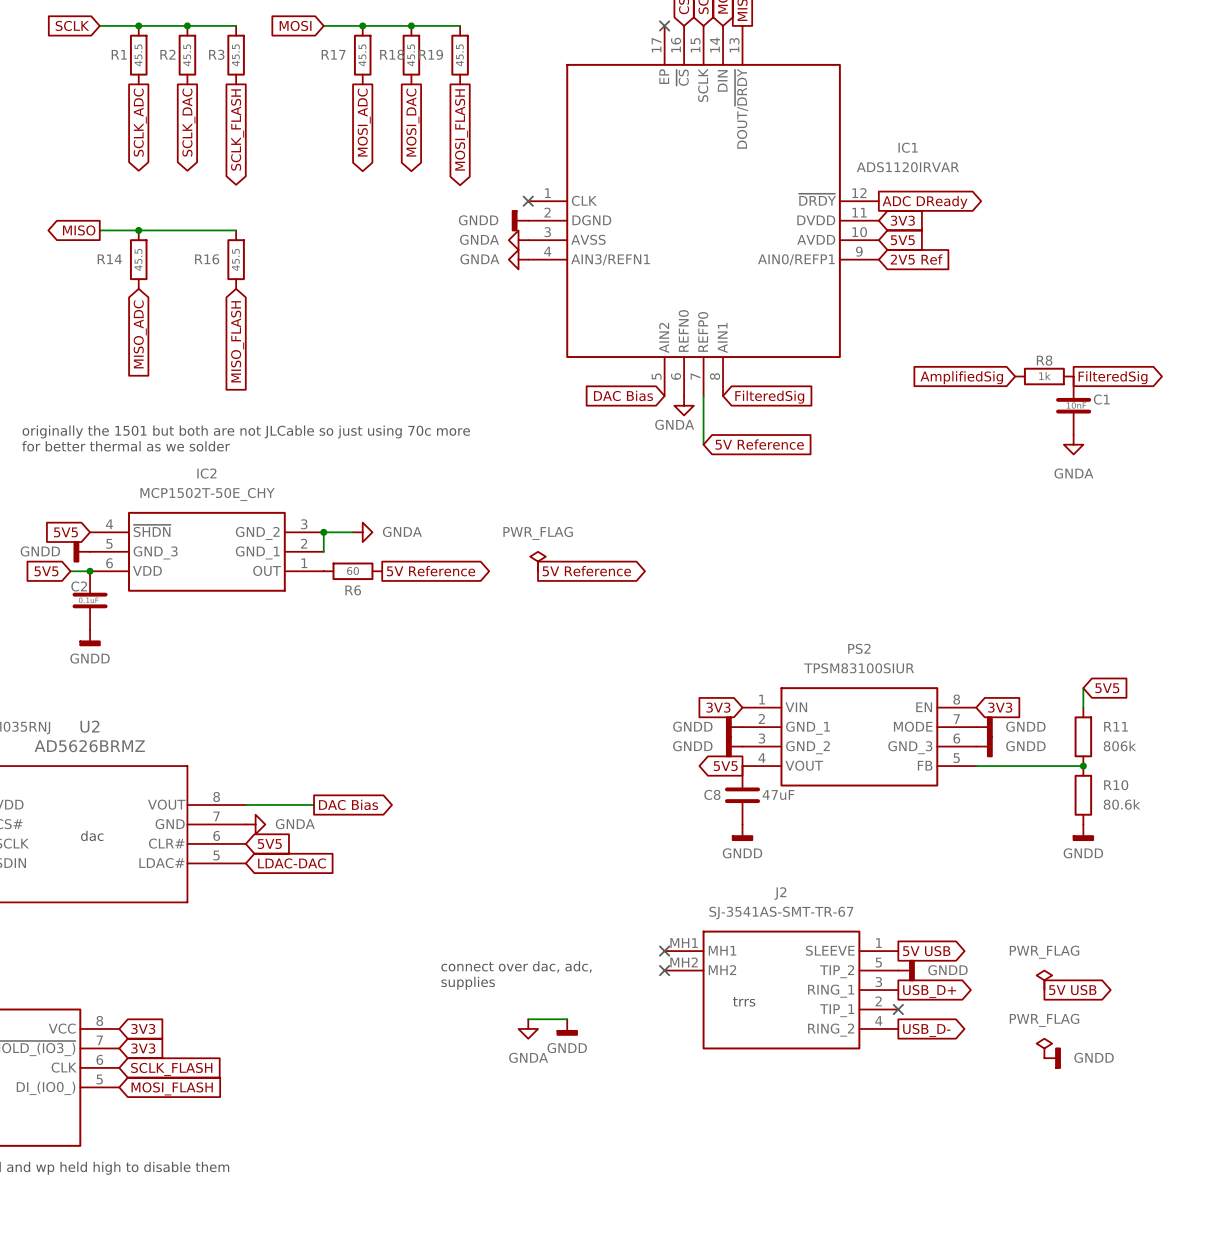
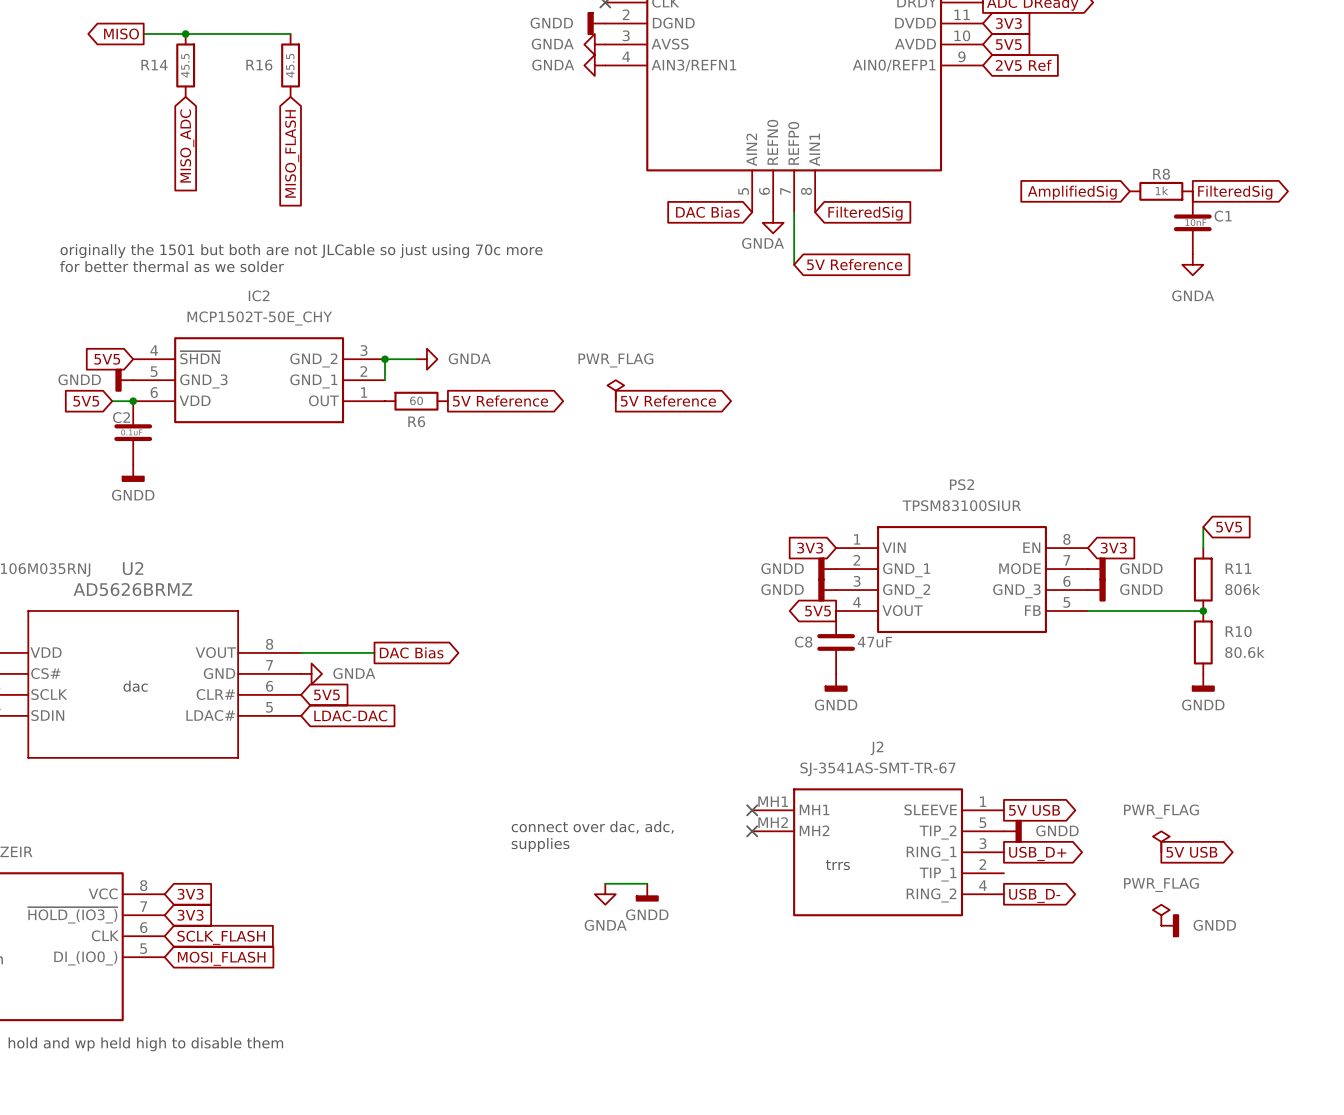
no-connect mark: (898, 1009) -> none

